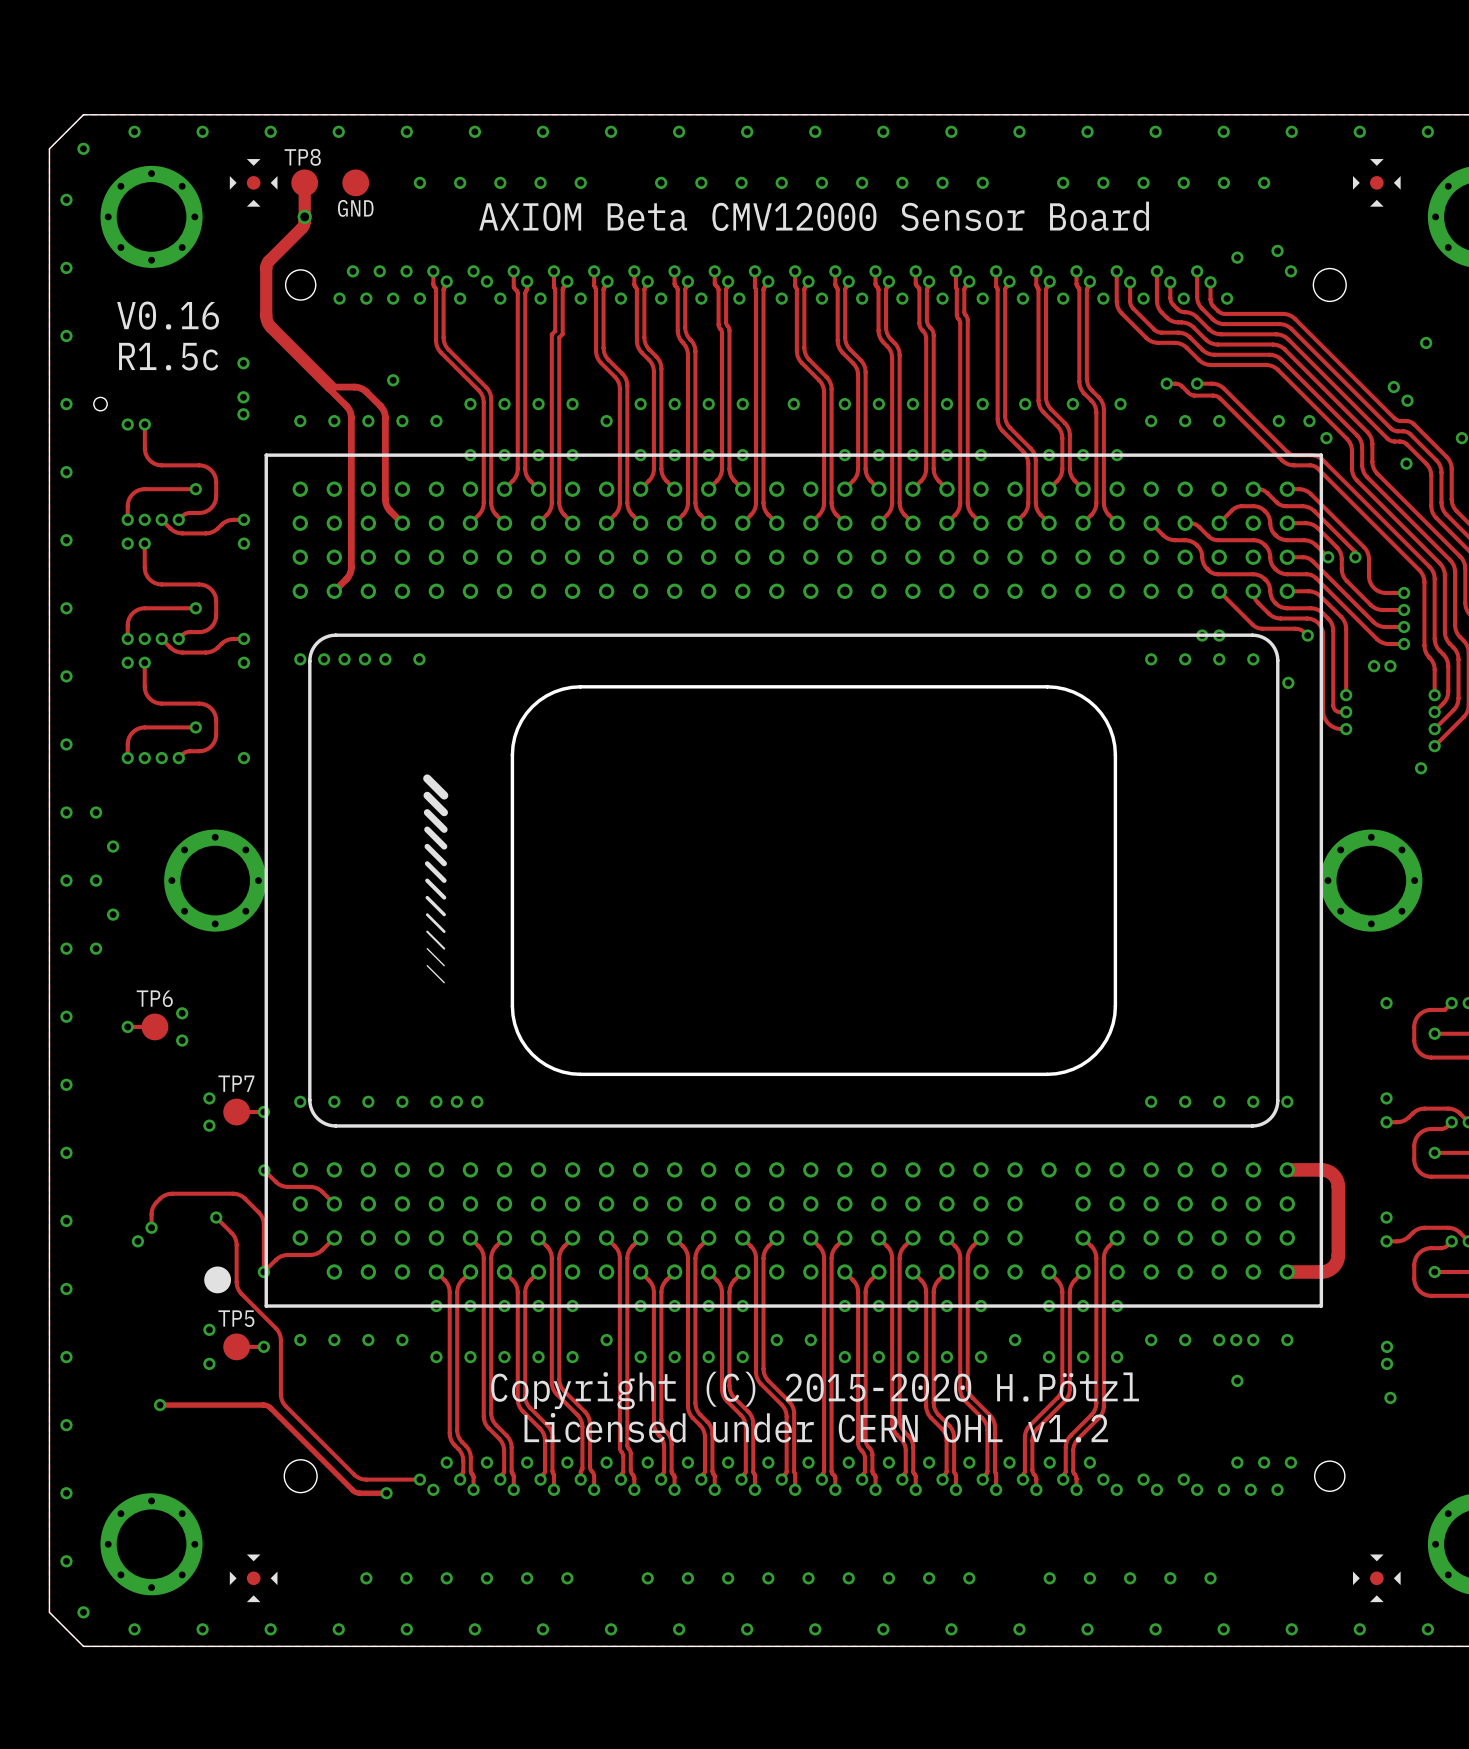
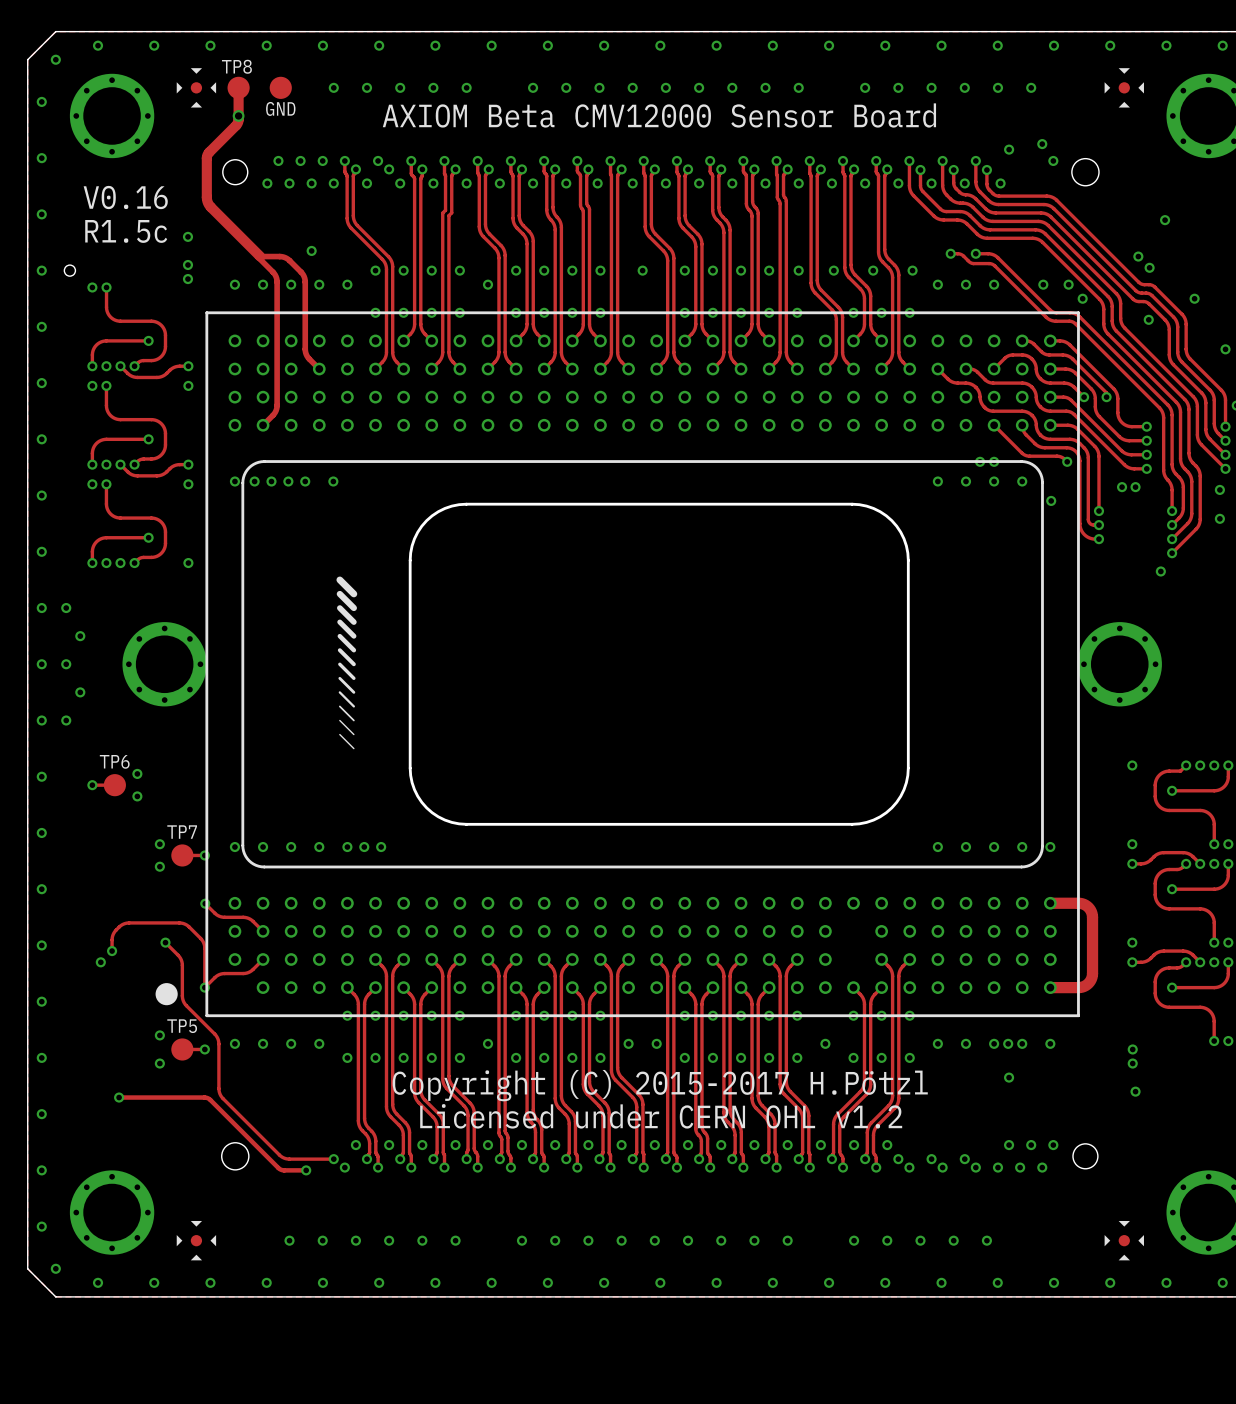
text: Copyright (C) 2015-2020 H.Pötzl (815, 1390) -> Copyright (C) 2015-2017 H.Pötzl (660, 1085)

